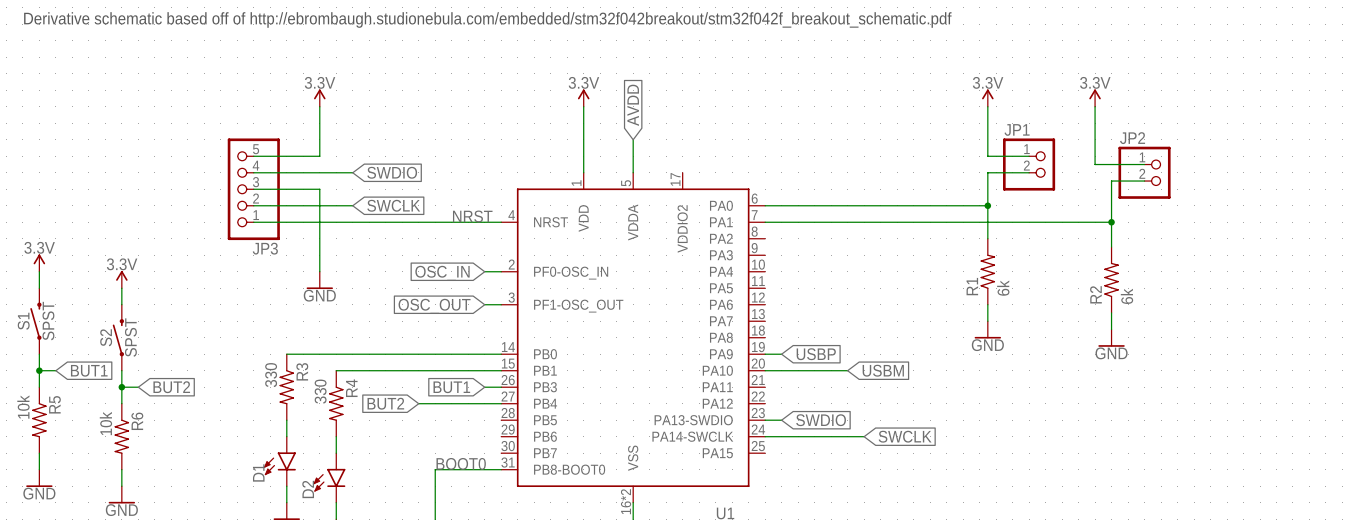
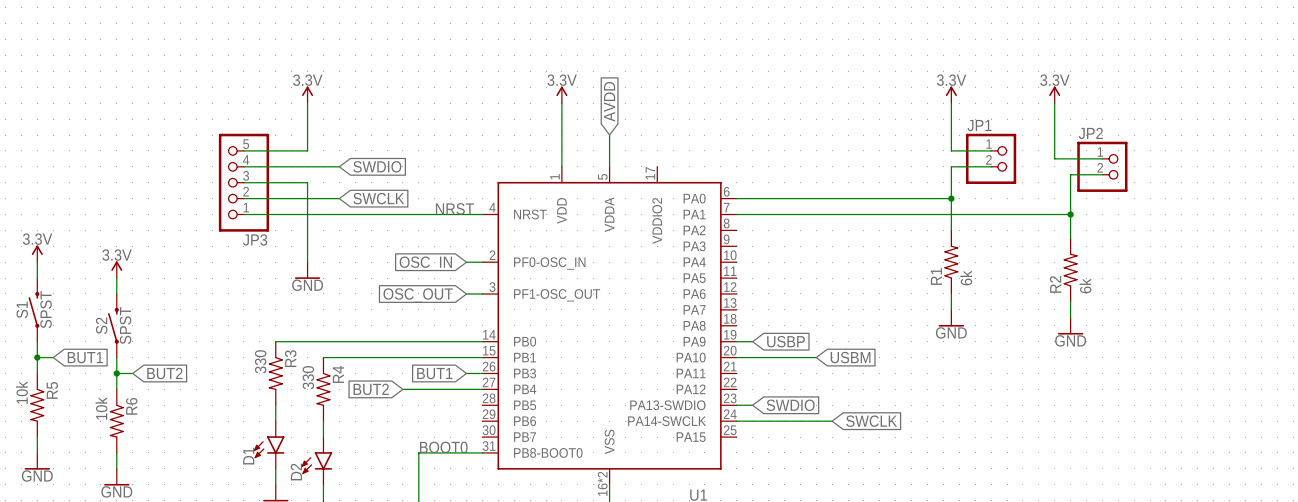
text: Derivative schematic based off of http://ebrombaugh.studionebula.com/embedded/stm32f042breakout/stm32f042f_breakout_schematic.pdf (487, 19) -> none

